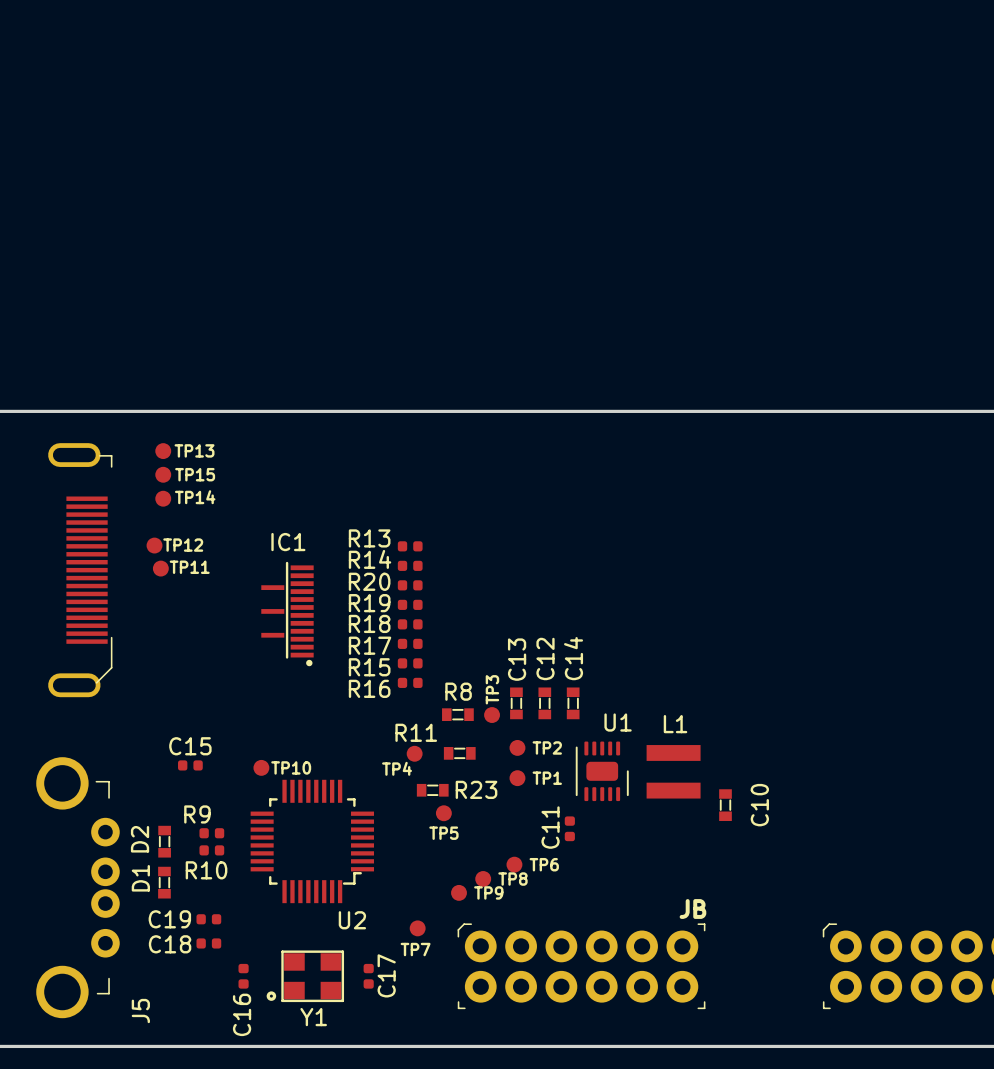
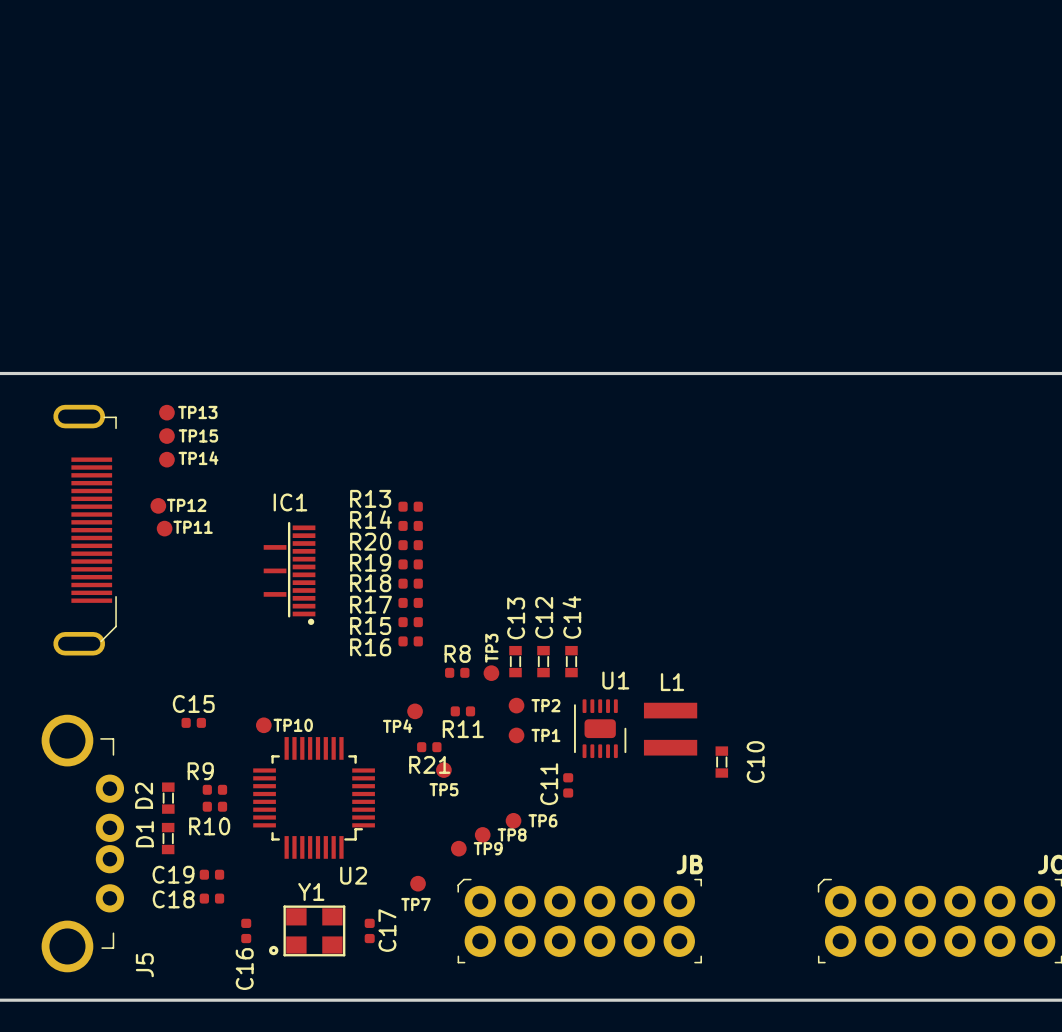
R8 footprint: [442, 708, 474, 722] -> [445, 667, 470, 678]
R11 name position: R11 (416, 732) -> R11 (463, 729)
R11 footprint: [443, 747, 476, 760] -> [450, 706, 476, 717]
R21: none -> (429, 747)
R23: (432, 790) -> none
Y1 name position: Y1 (313, 1017) -> Y1 (311, 891)

